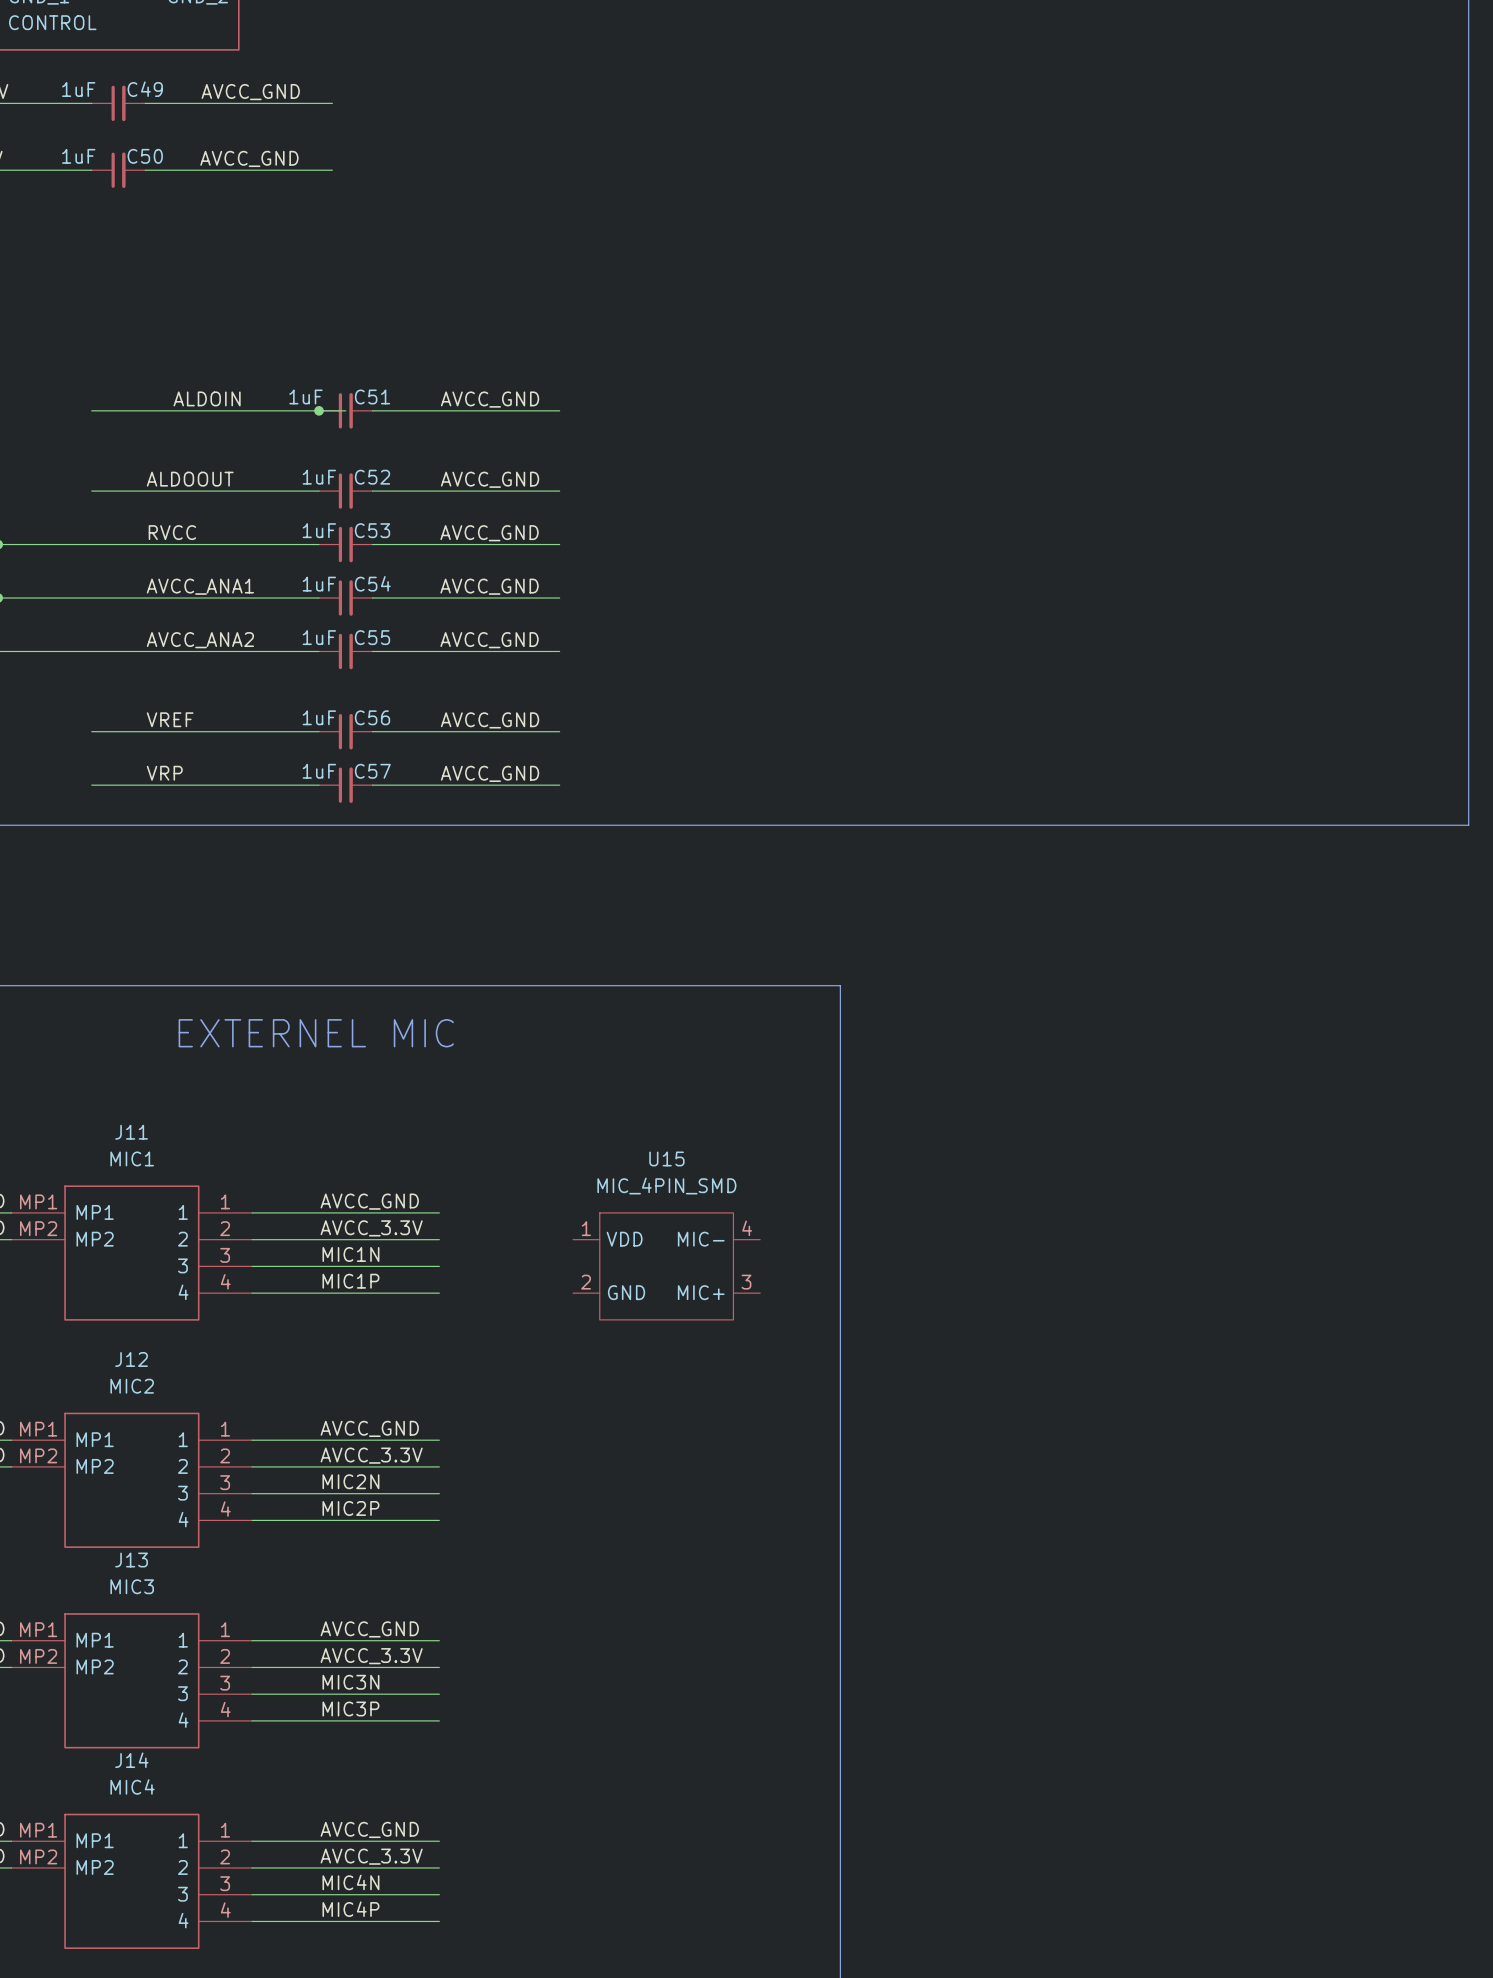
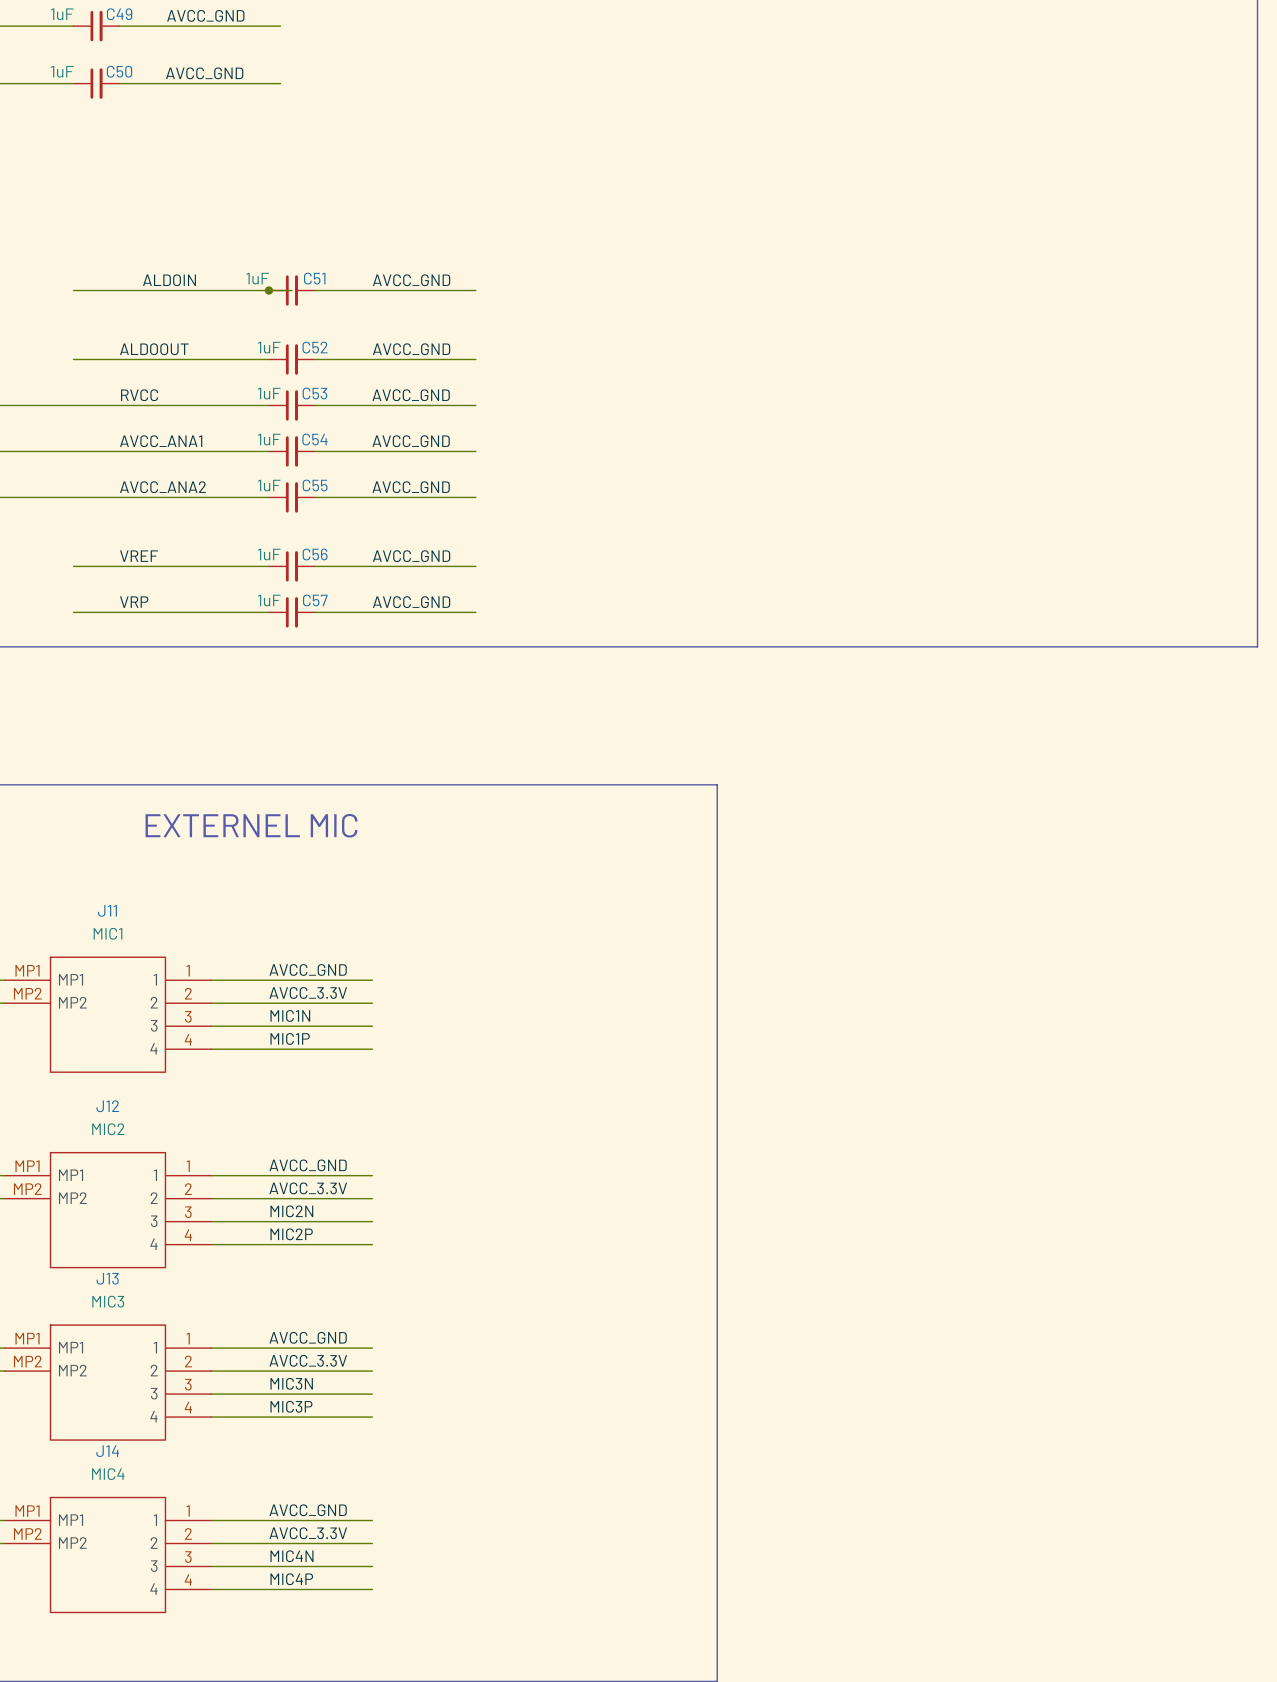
U15: MIC_4PIN_SMD (666, 1266) -> none

